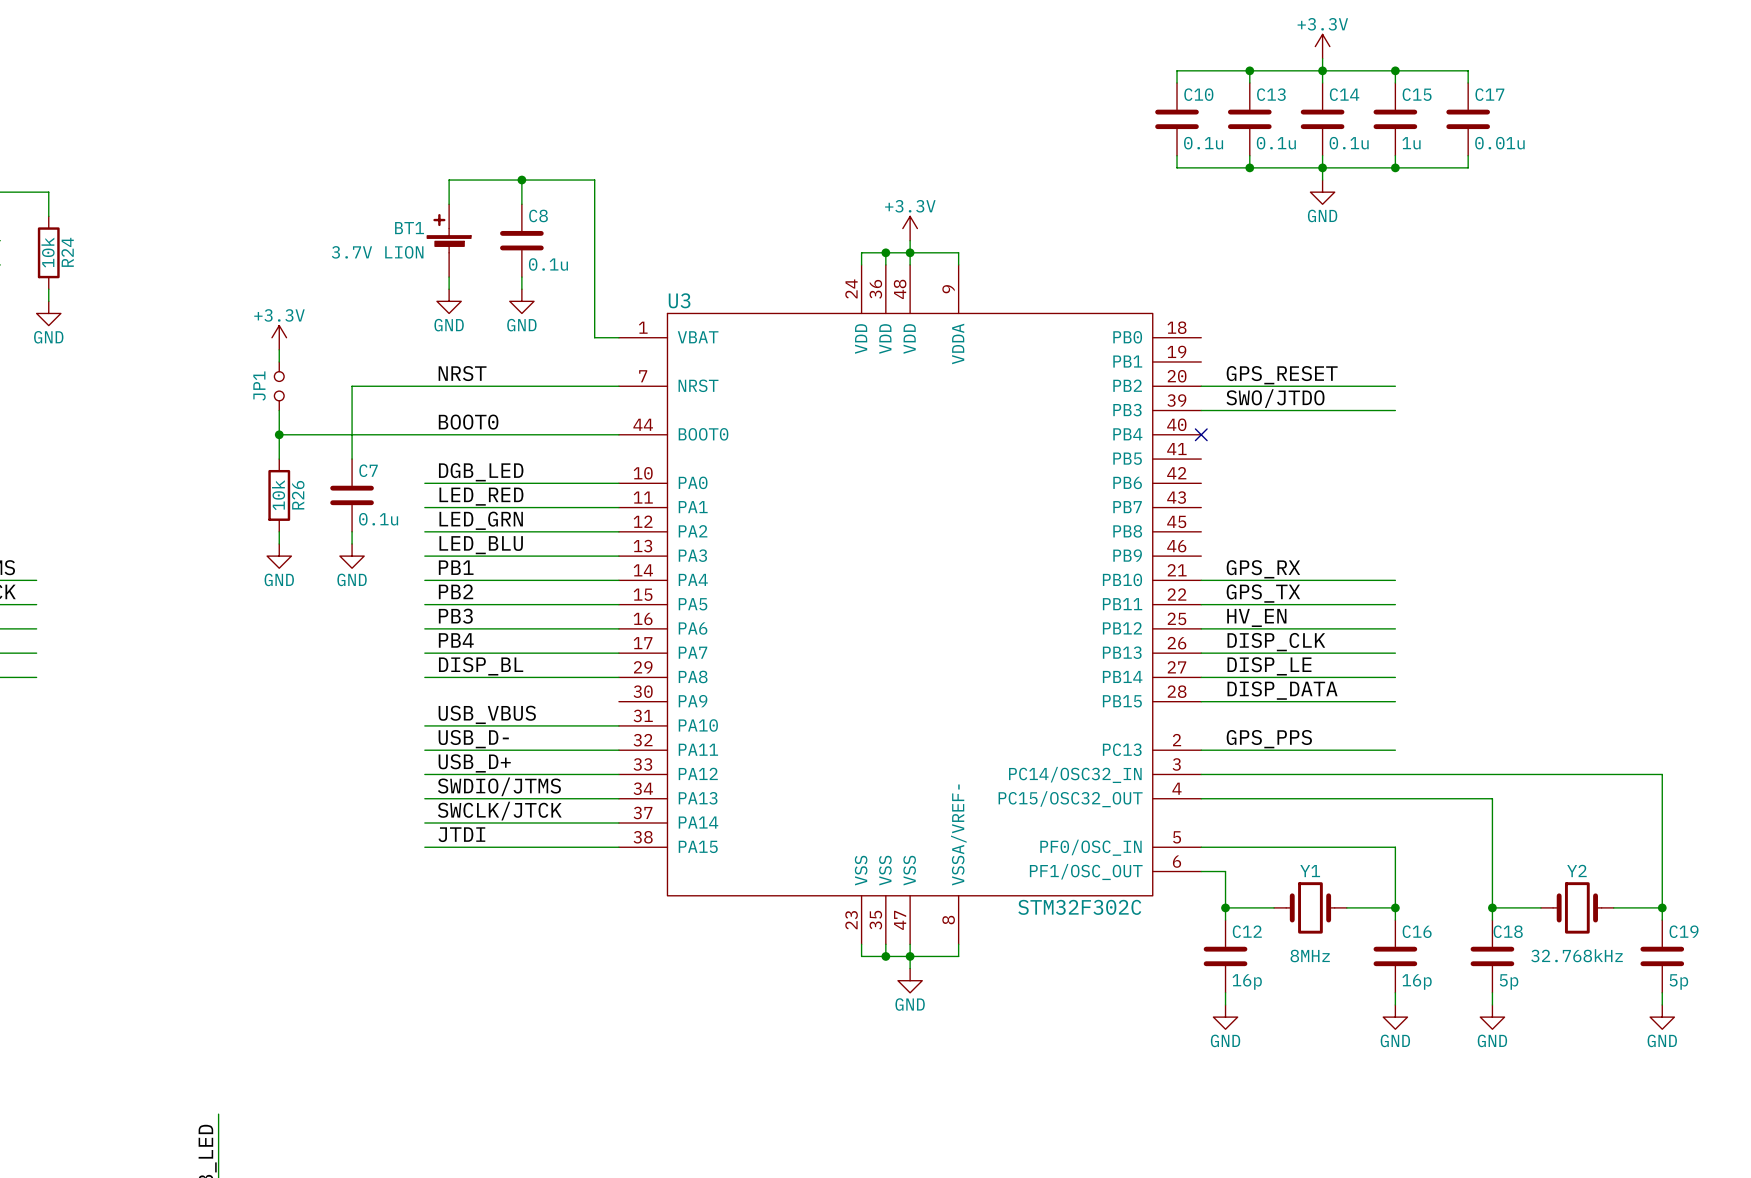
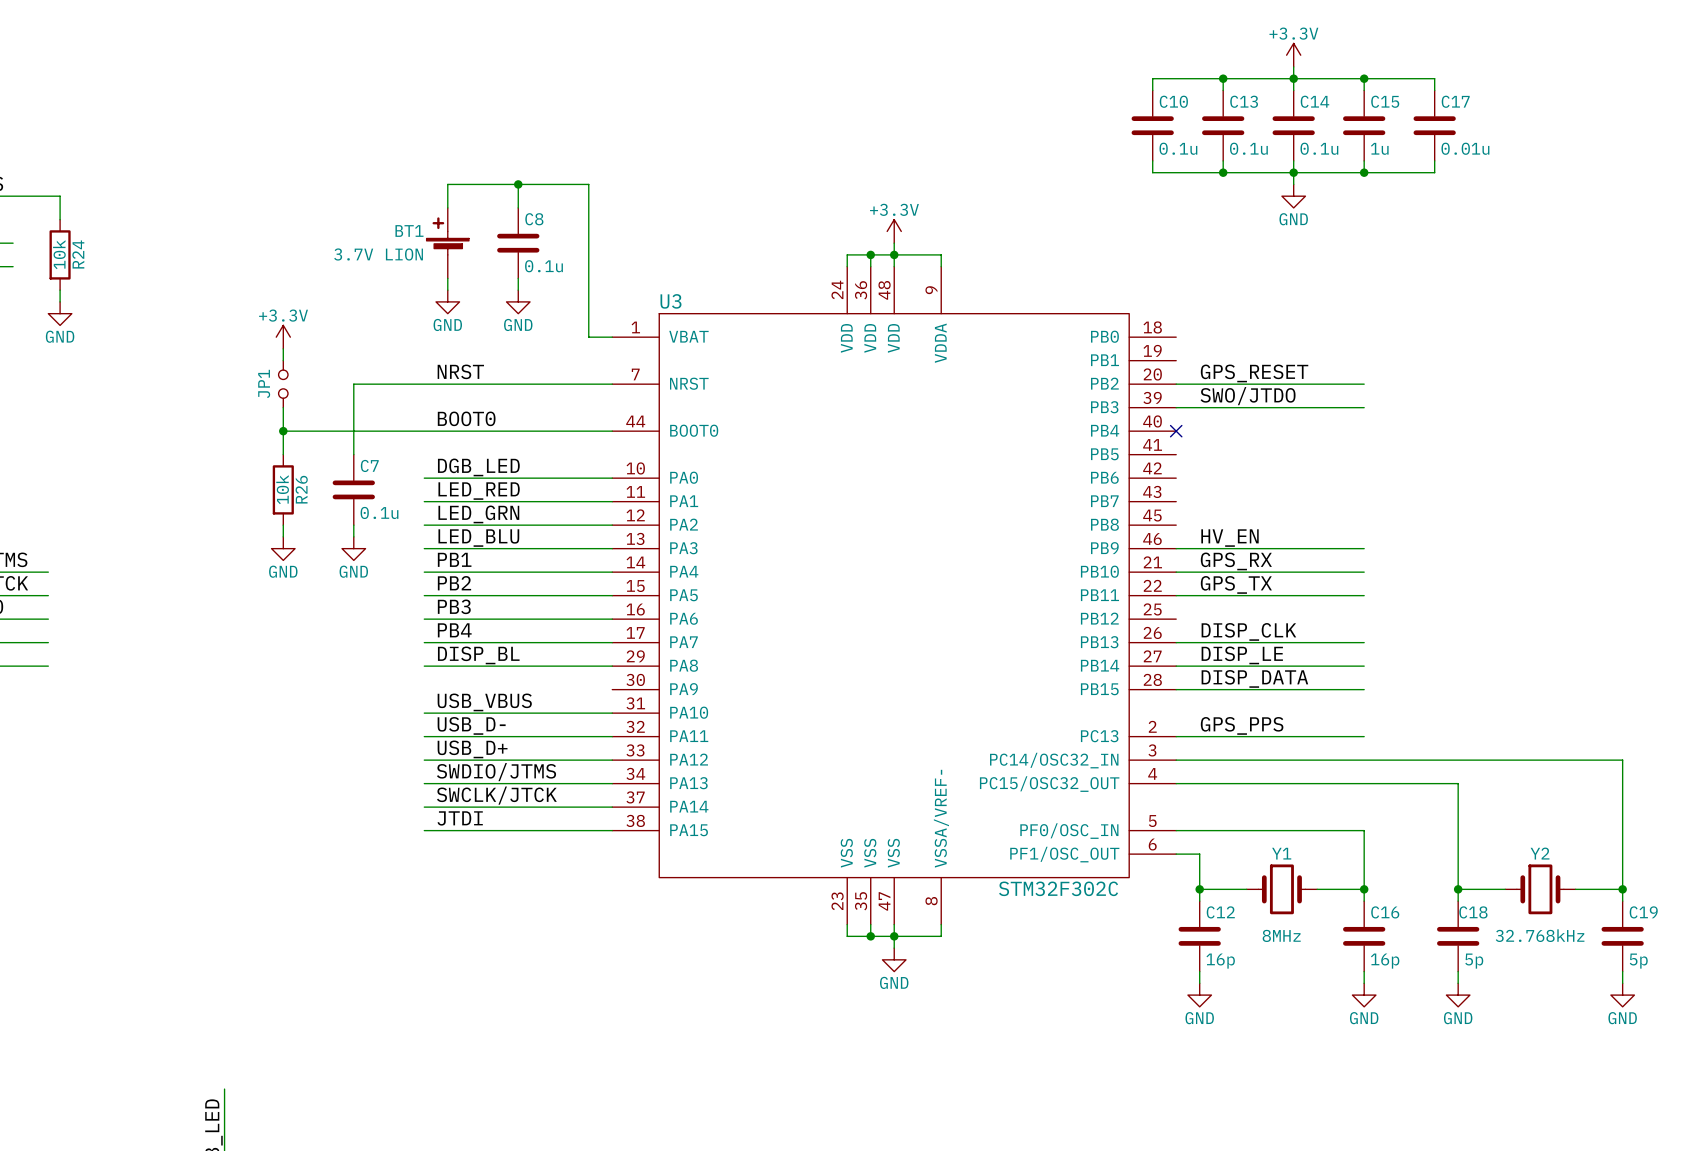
label position: HV_EN (1256, 617) -> HV_EN (1229, 538)
wire: (1201, 628) (1395, 628) -> (1176, 548) (1364, 548)

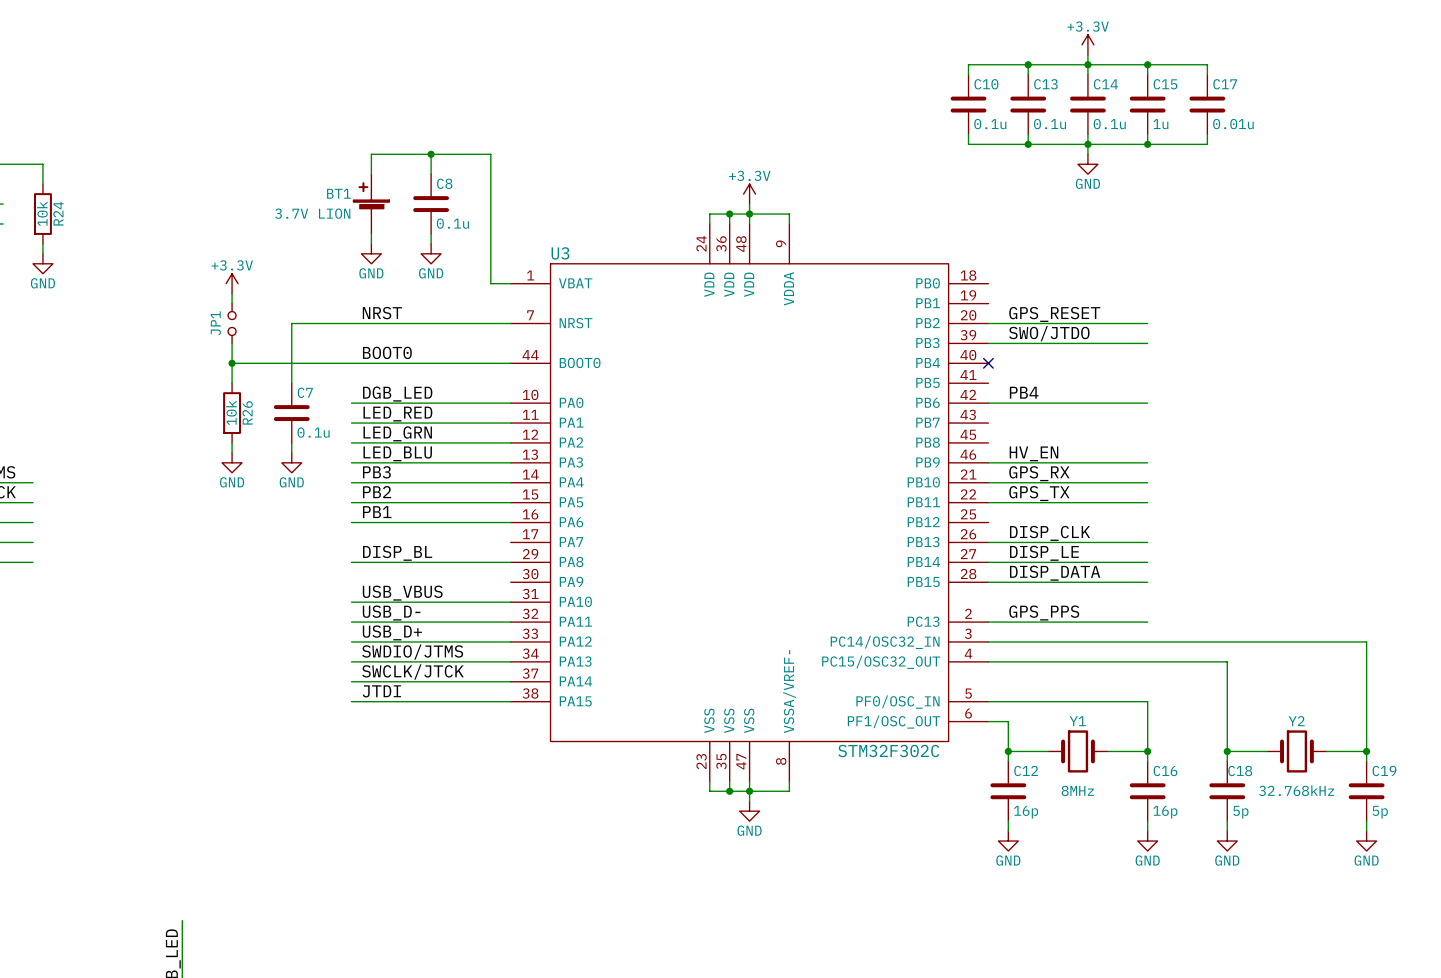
label: none -> PB4 (1024, 392)
wire: none -> (988, 403) (1147, 403)
label: PB1 (454, 559) -> PB3 (376, 472)
label: PB3 (454, 606) -> PB1 (377, 512)
label: PB4 (454, 630) -> none
wire: (424, 642) (612, 642) -> none

